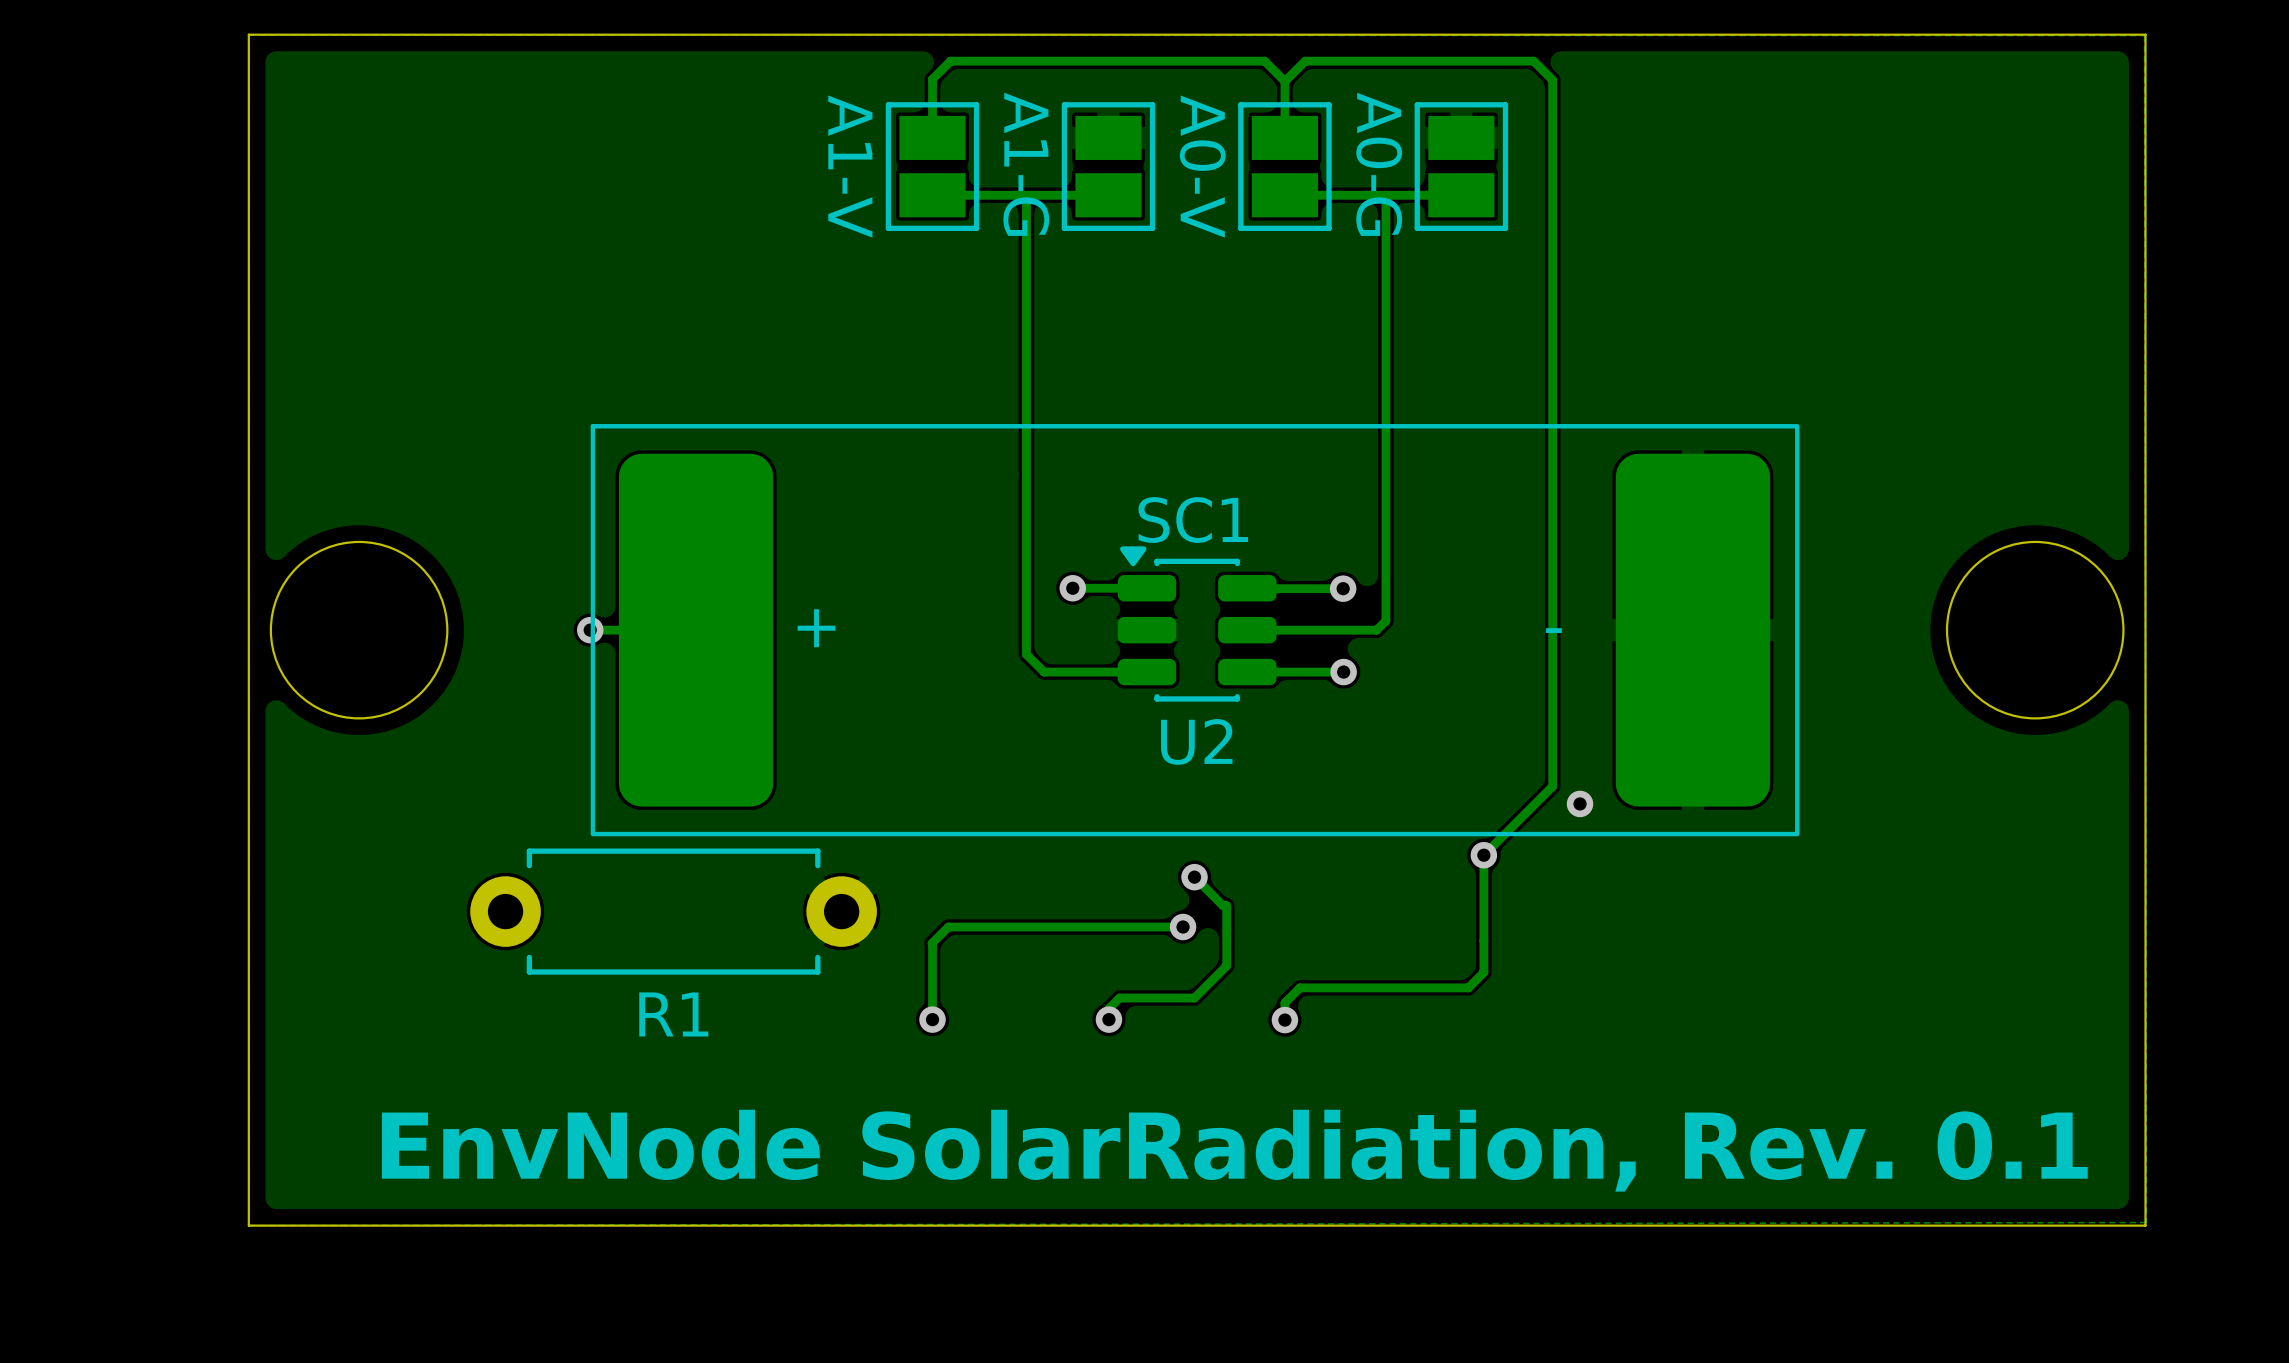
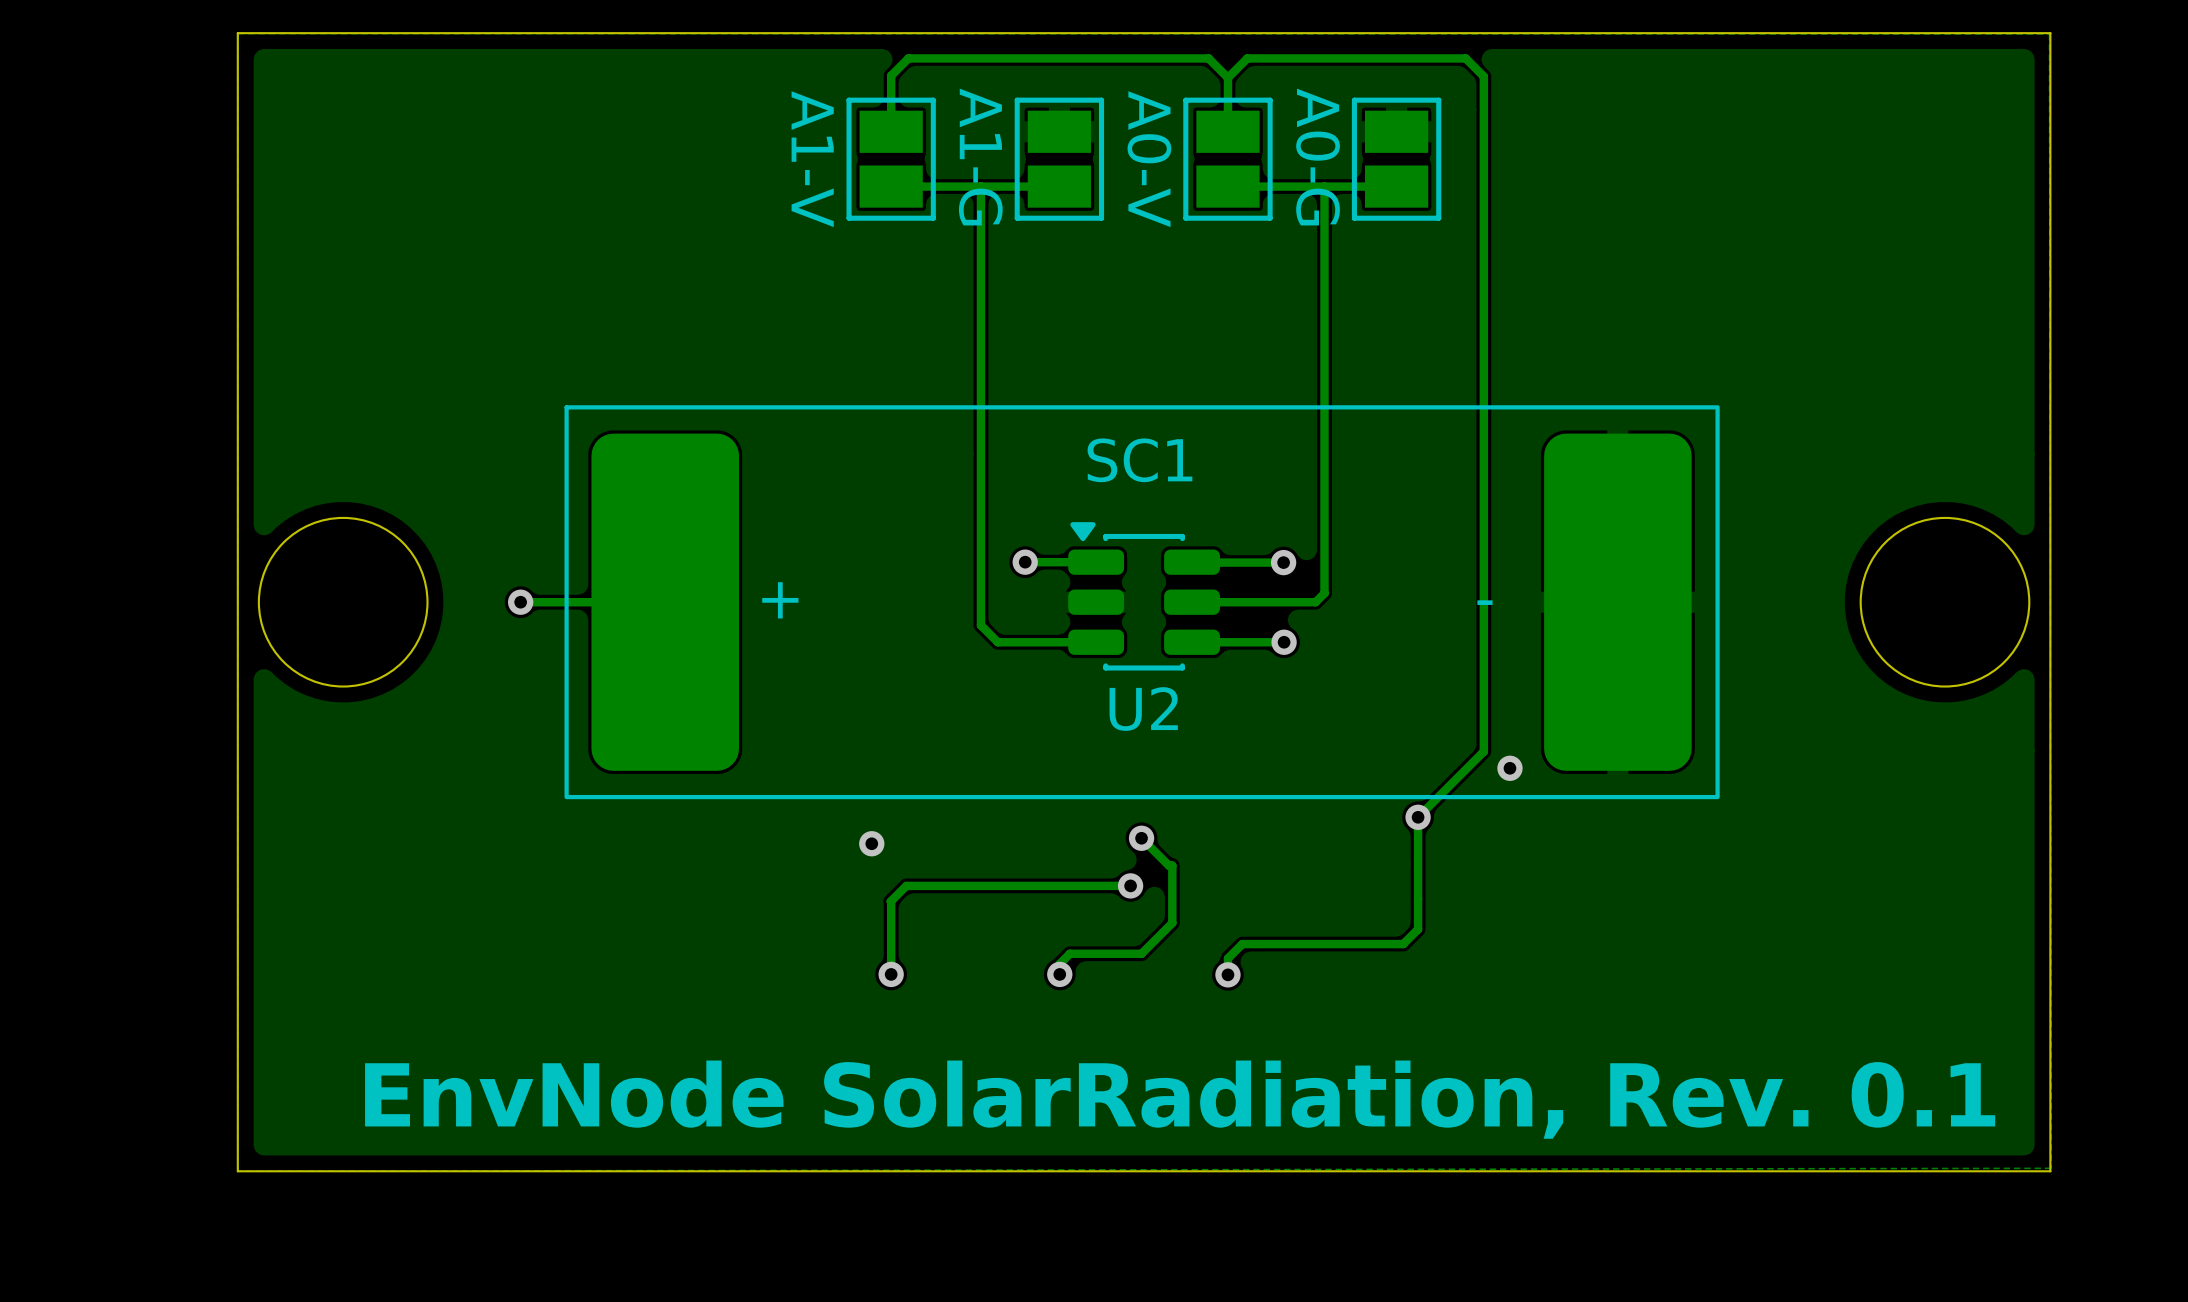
SC1 name position: SC1 (1193, 520) -> SC1 (1139, 460)
track: none -> (564, 602) (520, 602)
via position: (590, 630) -> (520, 602)
via: none -> (871, 843)
R1: (673, 911) -> none

